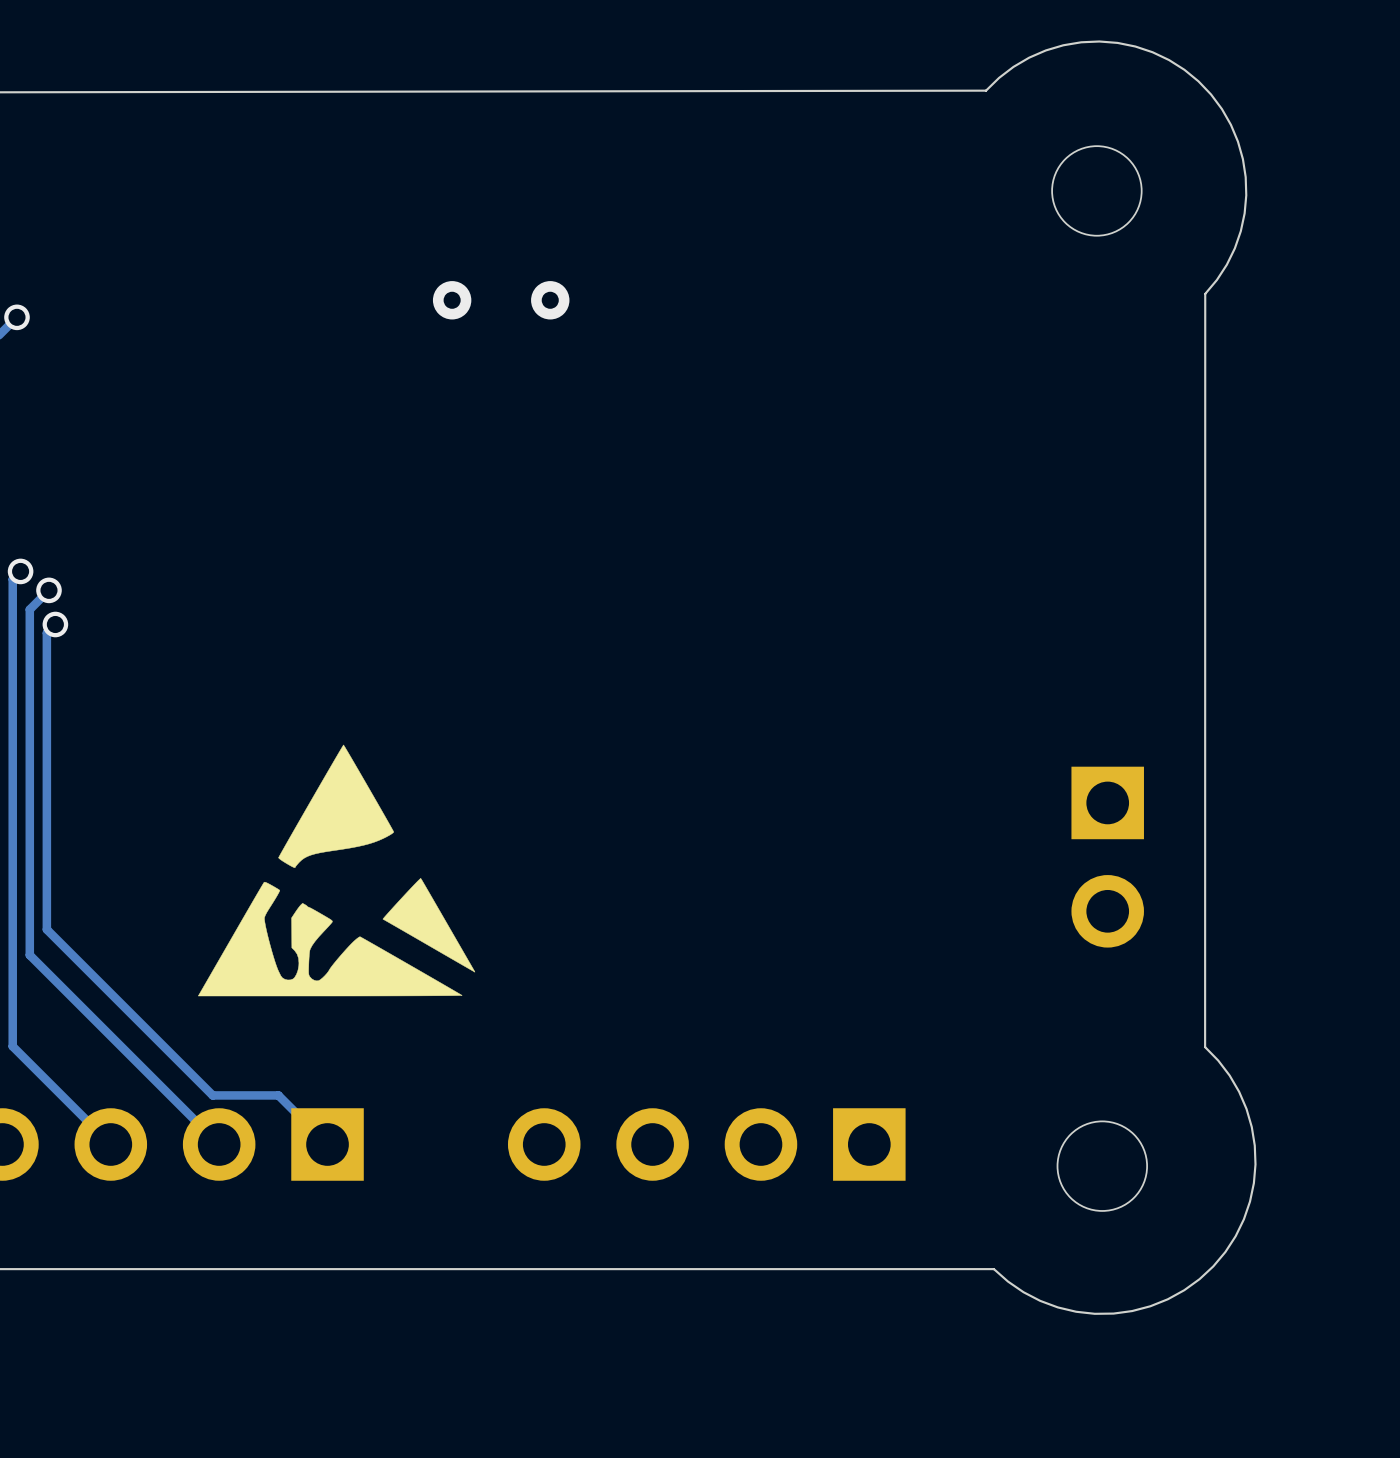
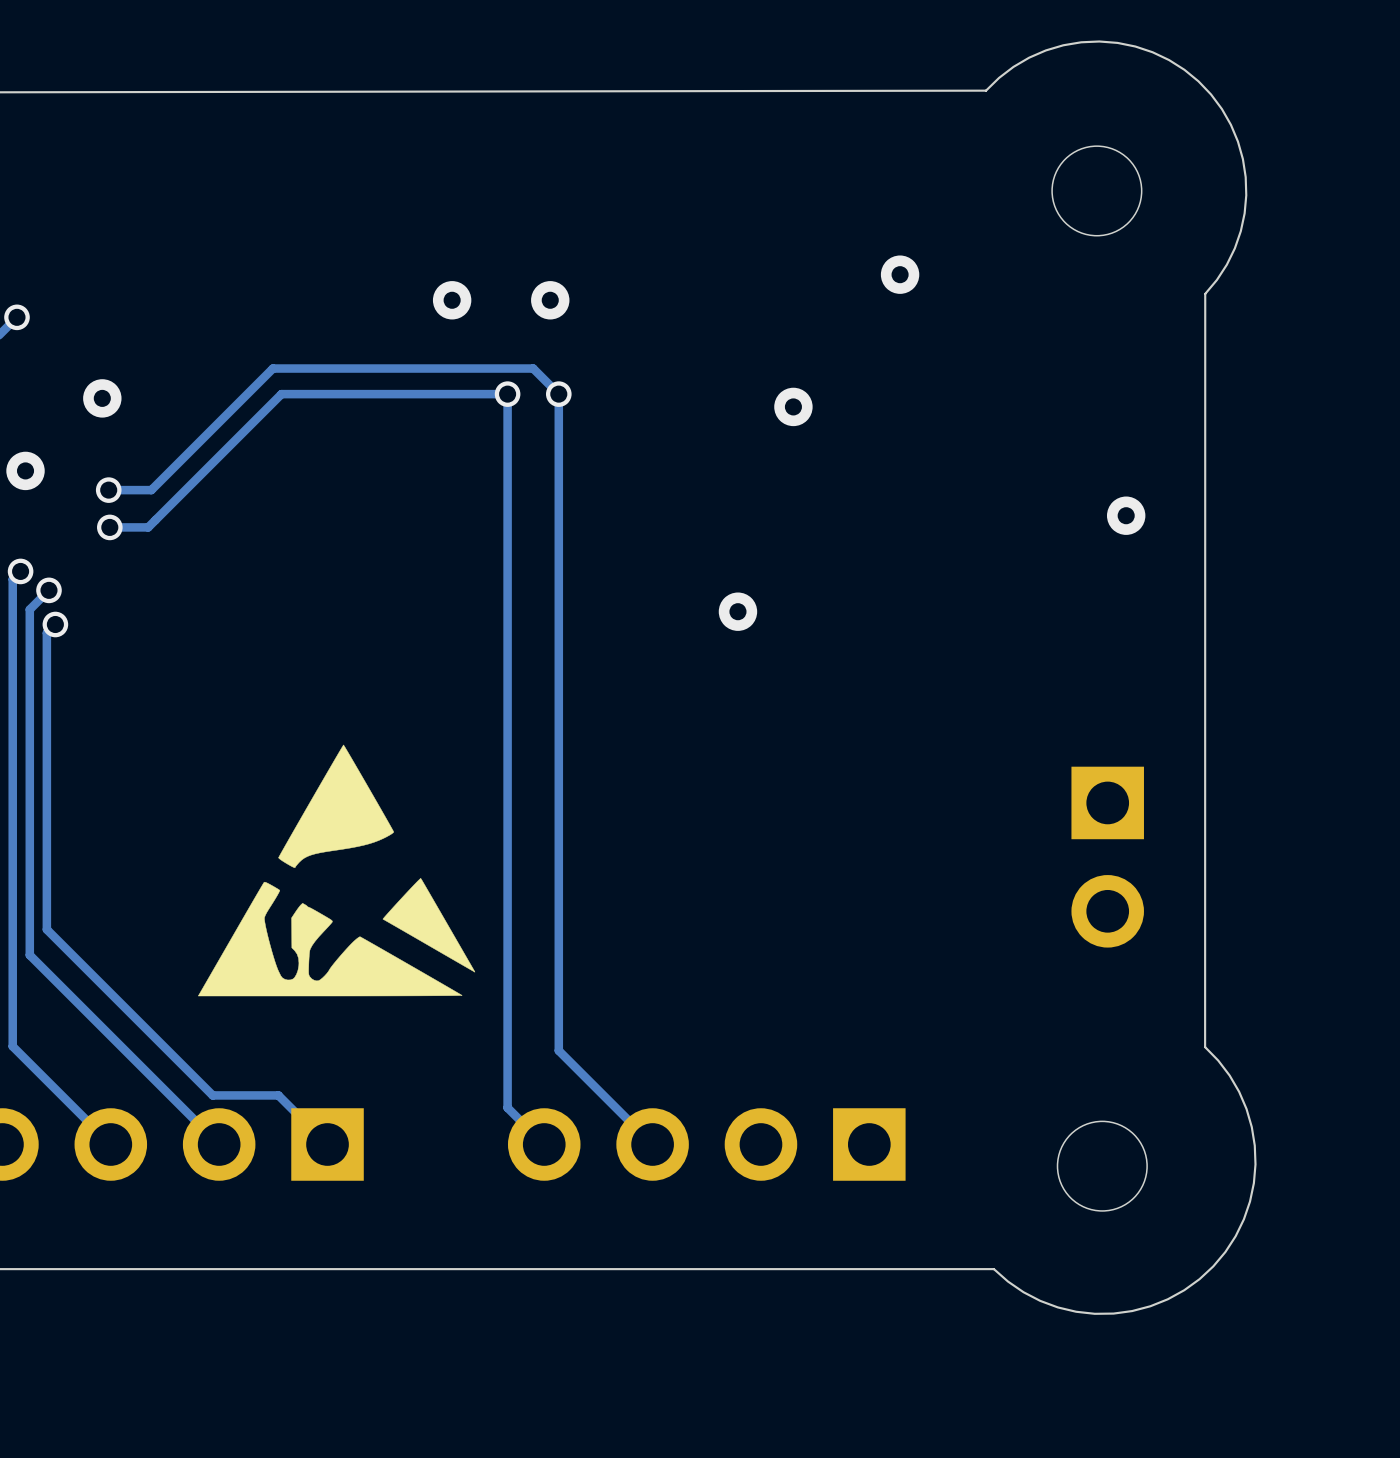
via: none -> (900, 274)
via: none -> (507, 394)
via: none -> (558, 394)
via: none -> (102, 398)
via: none -> (793, 406)
via: none -> (25, 470)
track: none -> (108, 490) (151, 490) (272, 368) (533, 368) (558, 394) (558, 1050) (652, 1144)
via: none -> (108, 490)
via: none -> (1126, 515)
track: none -> (109, 527) (148, 527) (281, 394) (507, 394) (507, 1107) (544, 1144)
via: none -> (109, 527)
via: none -> (737, 611)

